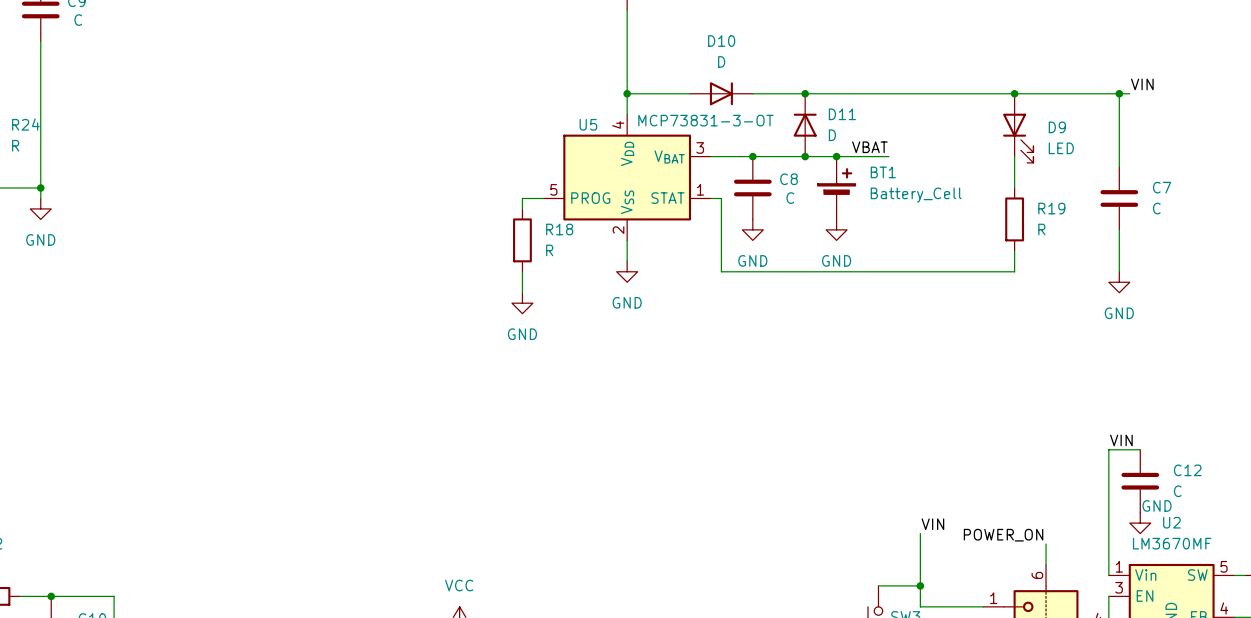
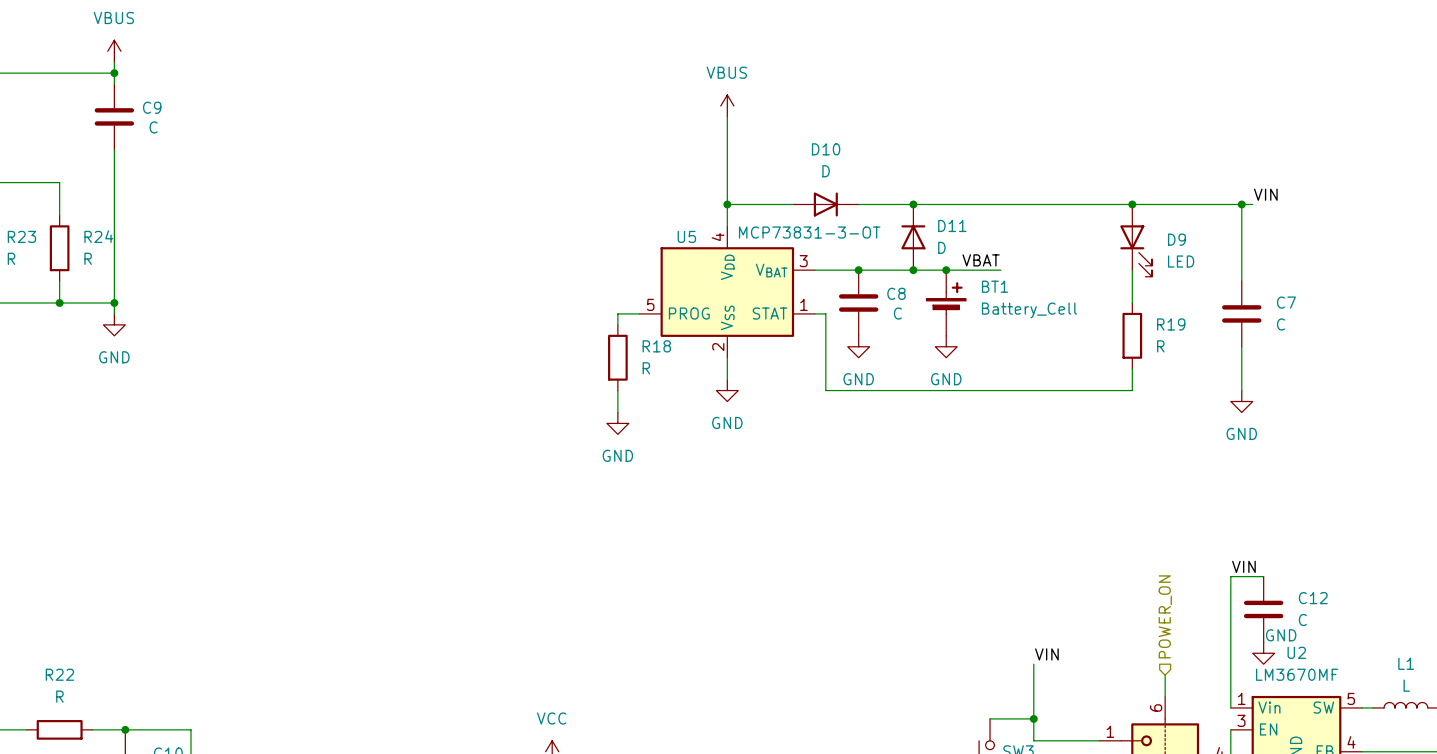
hierarchical label: none -> POWER_ON (1165, 616)
label: POWER_ON (1003, 535) -> none

